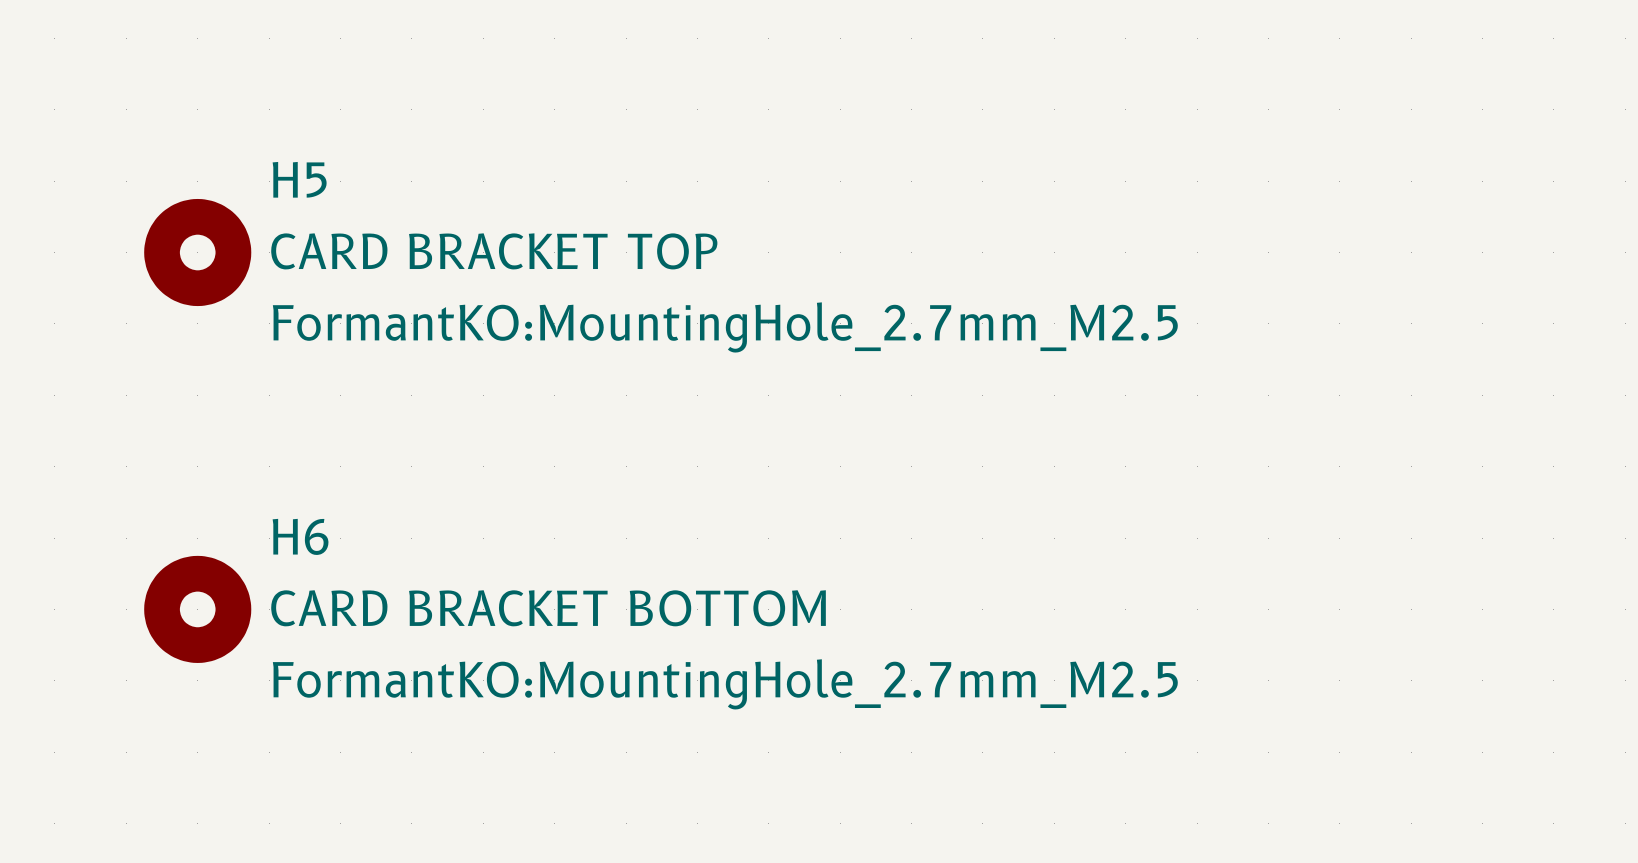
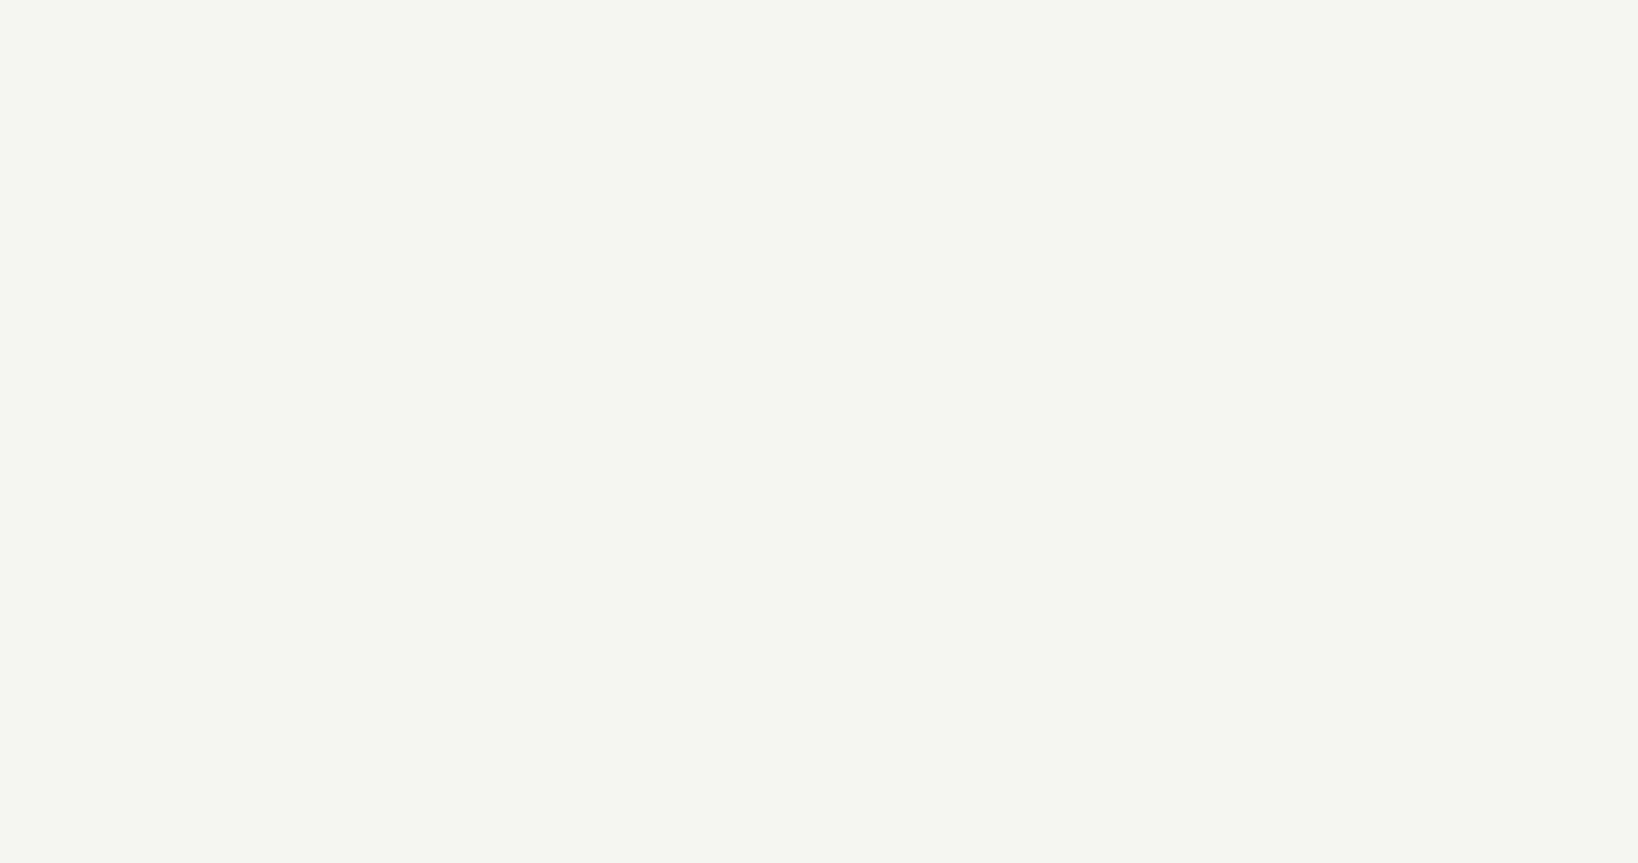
H5: CARD BRACKET TOP (197, 252) -> none
H6: CARD BRACKET BOTTOM (197, 609) -> none

